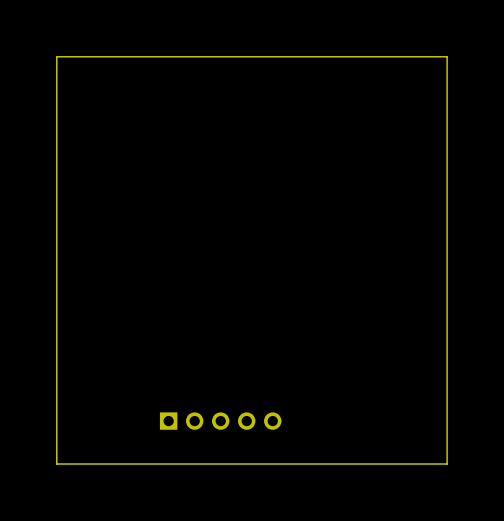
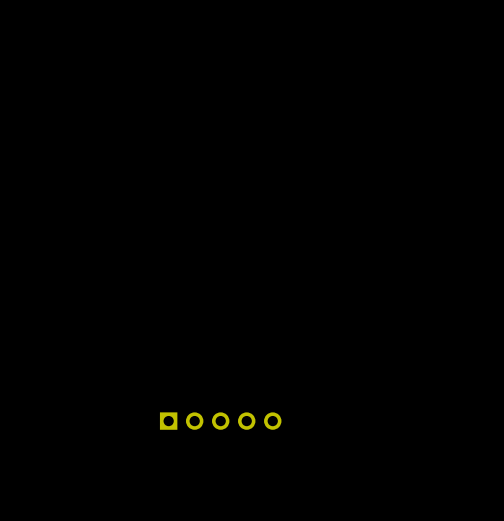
board edge: (447, 56) (56, 56) (56, 464) (447, 464) (447, 56) -> none

